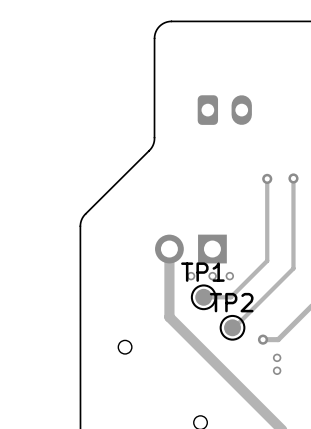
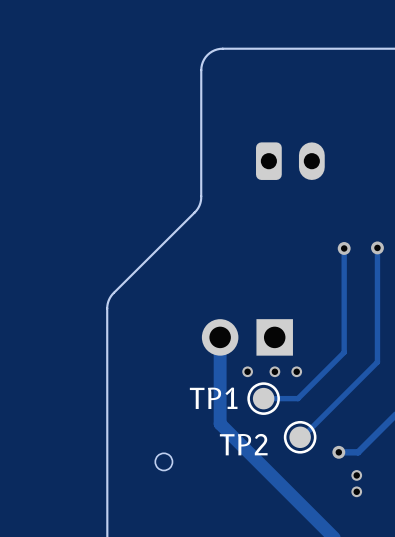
TP1 name position: TP1 (202, 272) -> TP1 (213, 398)
TP2 name position: TP2 (231, 302) -> TP2 (243, 444)

